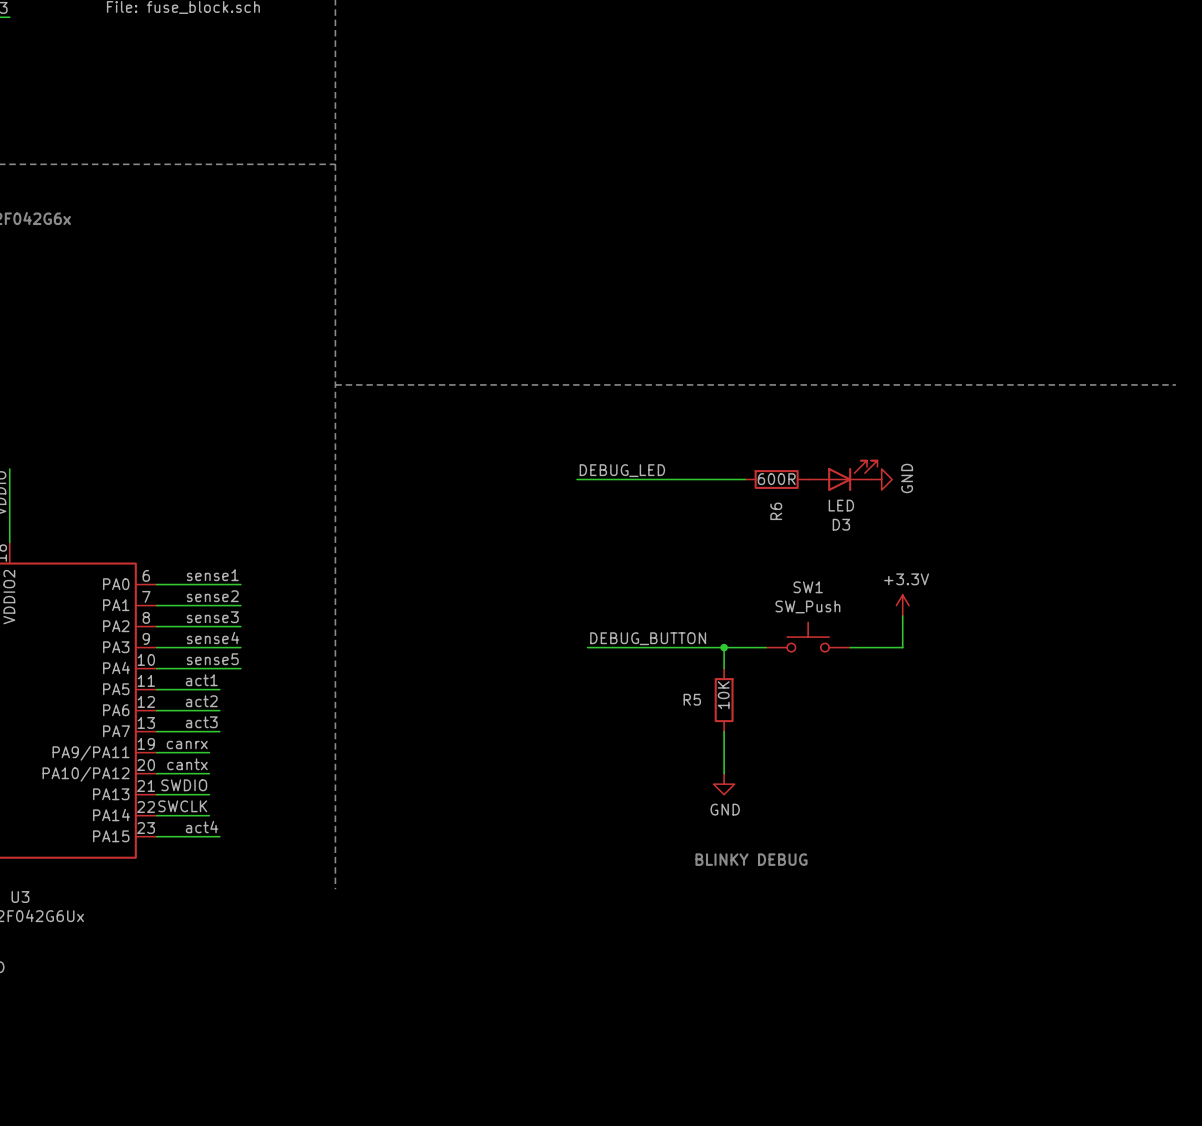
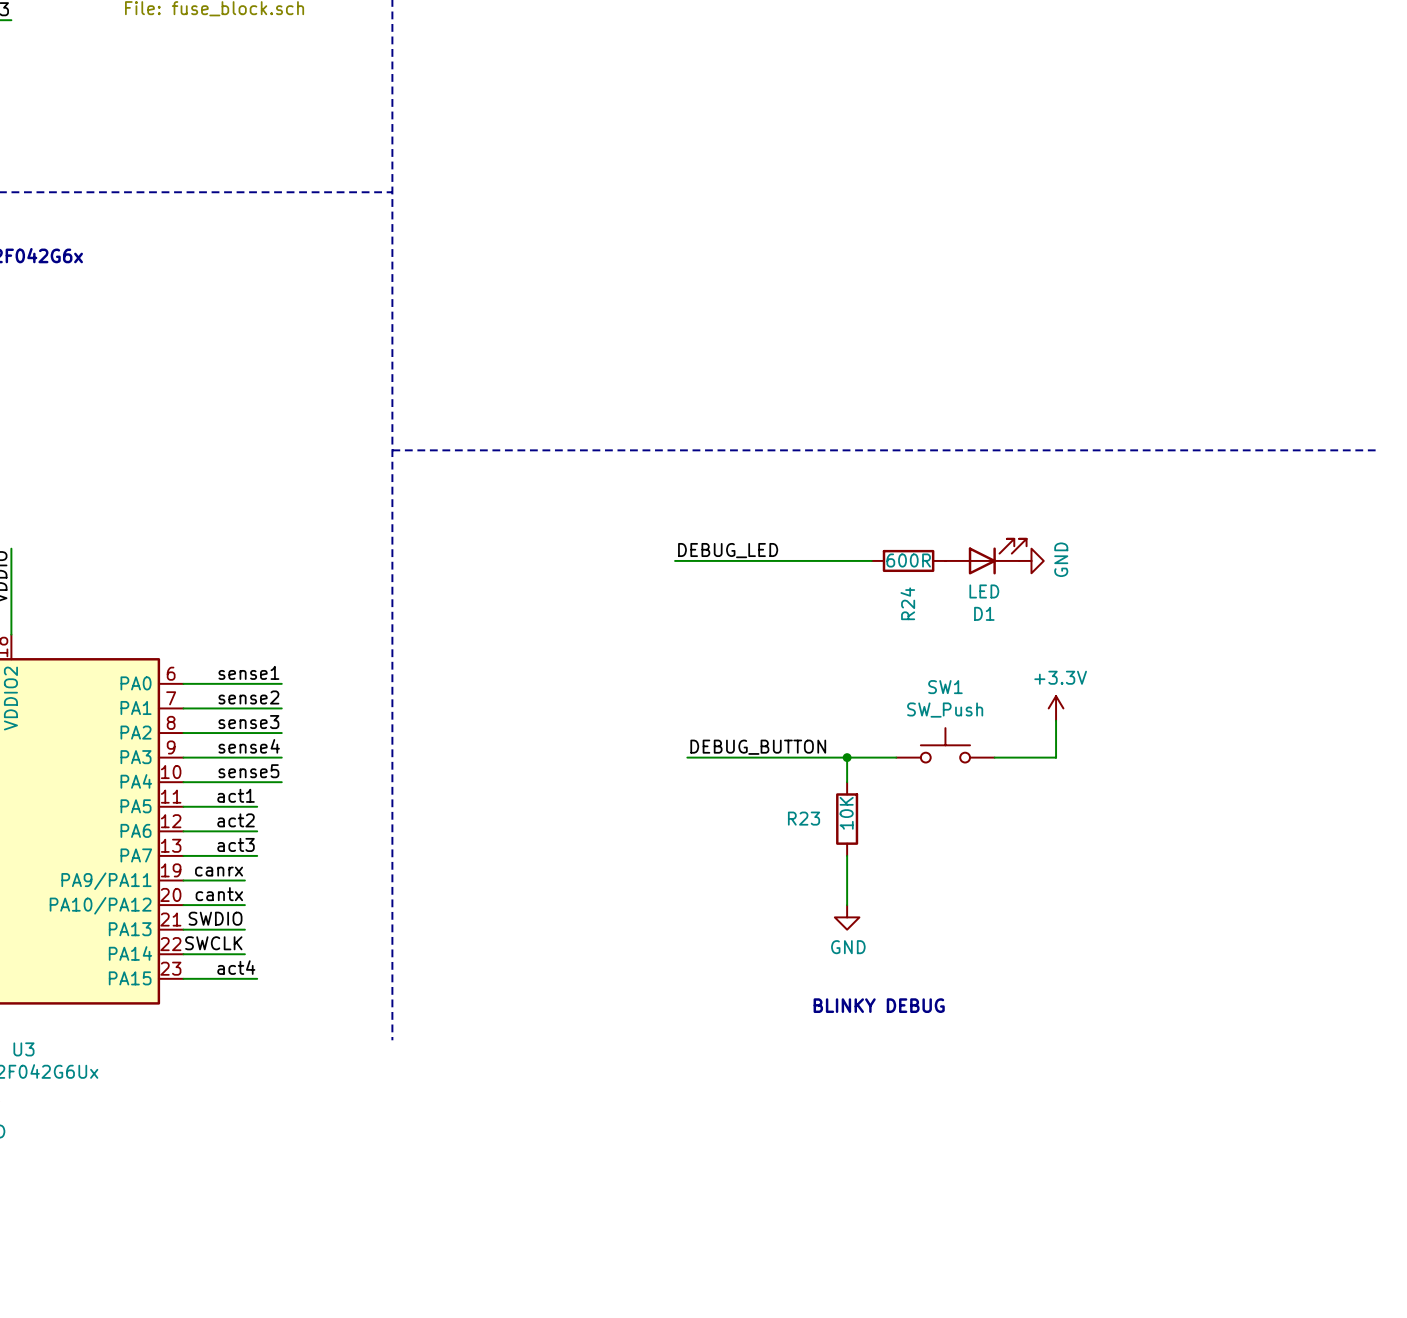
R6 name: R6 (776, 511) -> R24 (907, 603)
D3 name: D3 (841, 524) -> D1 (984, 613)
R5 name: R5 (692, 699) -> R23 (804, 818)

